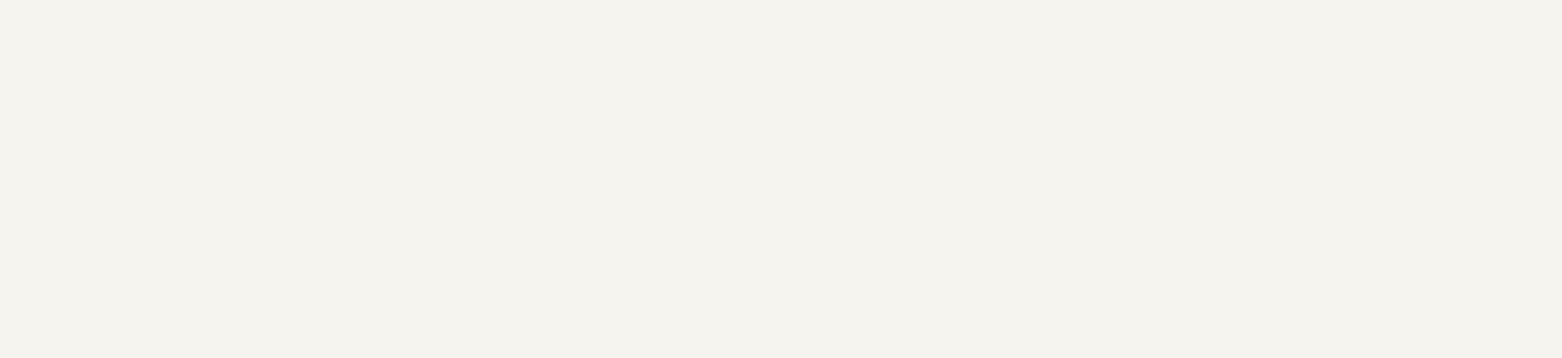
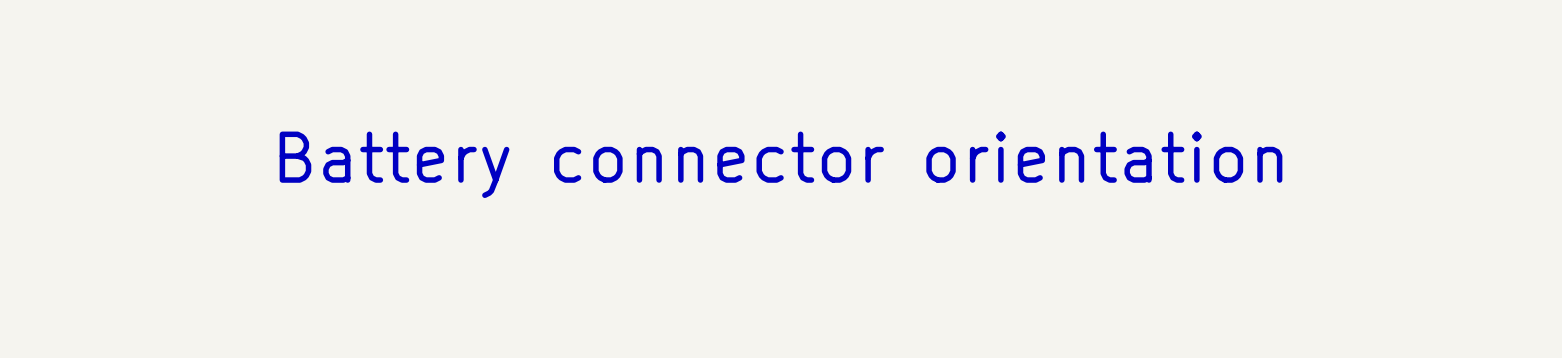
text: none -> Battery connector orientation (781, 164)

